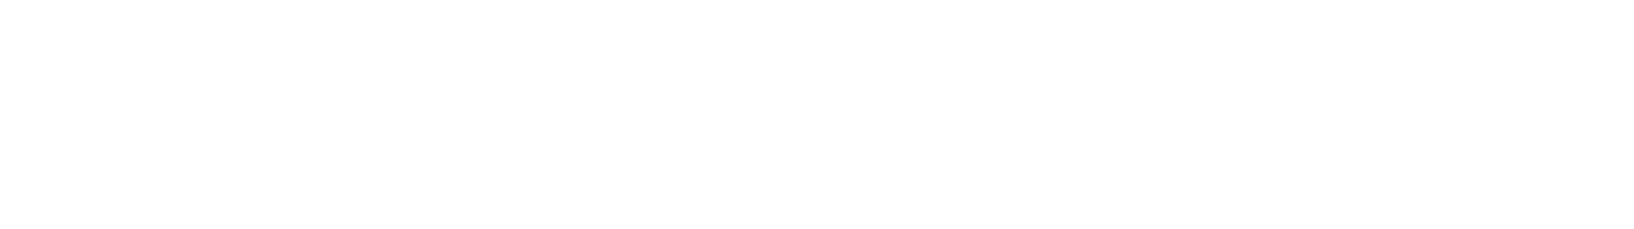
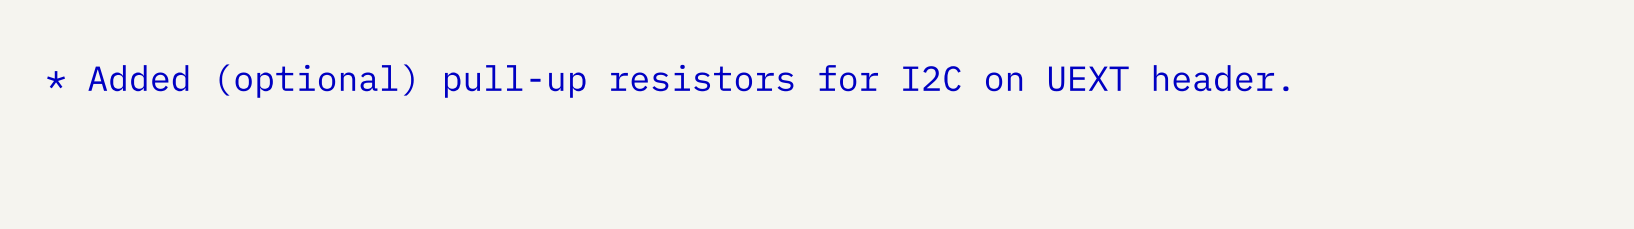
text: none -> * Added (optional) pull-up resistors for I2C on UEXT header. (667, 81)

